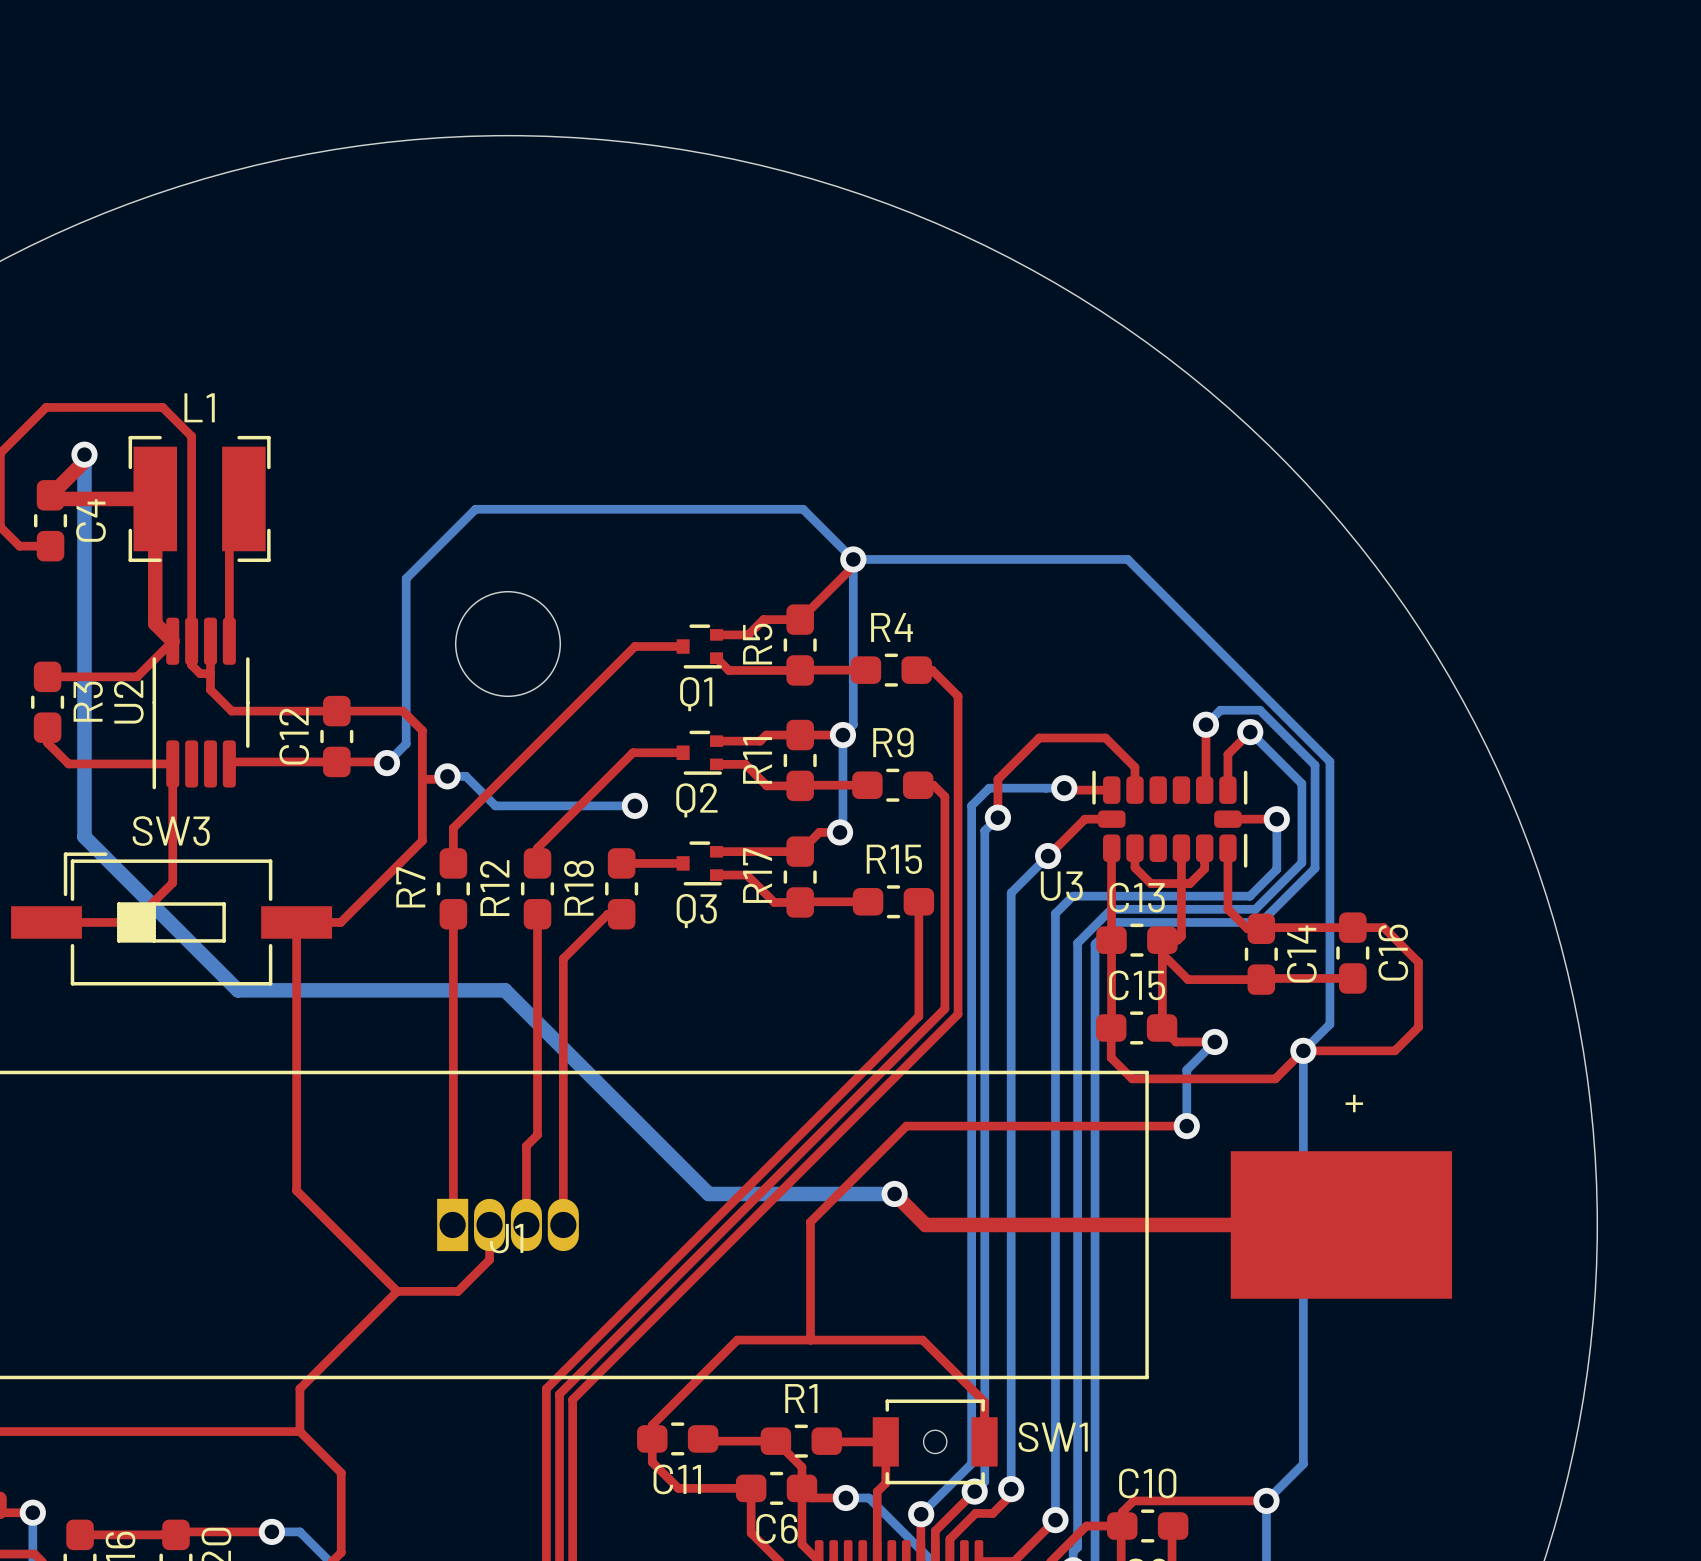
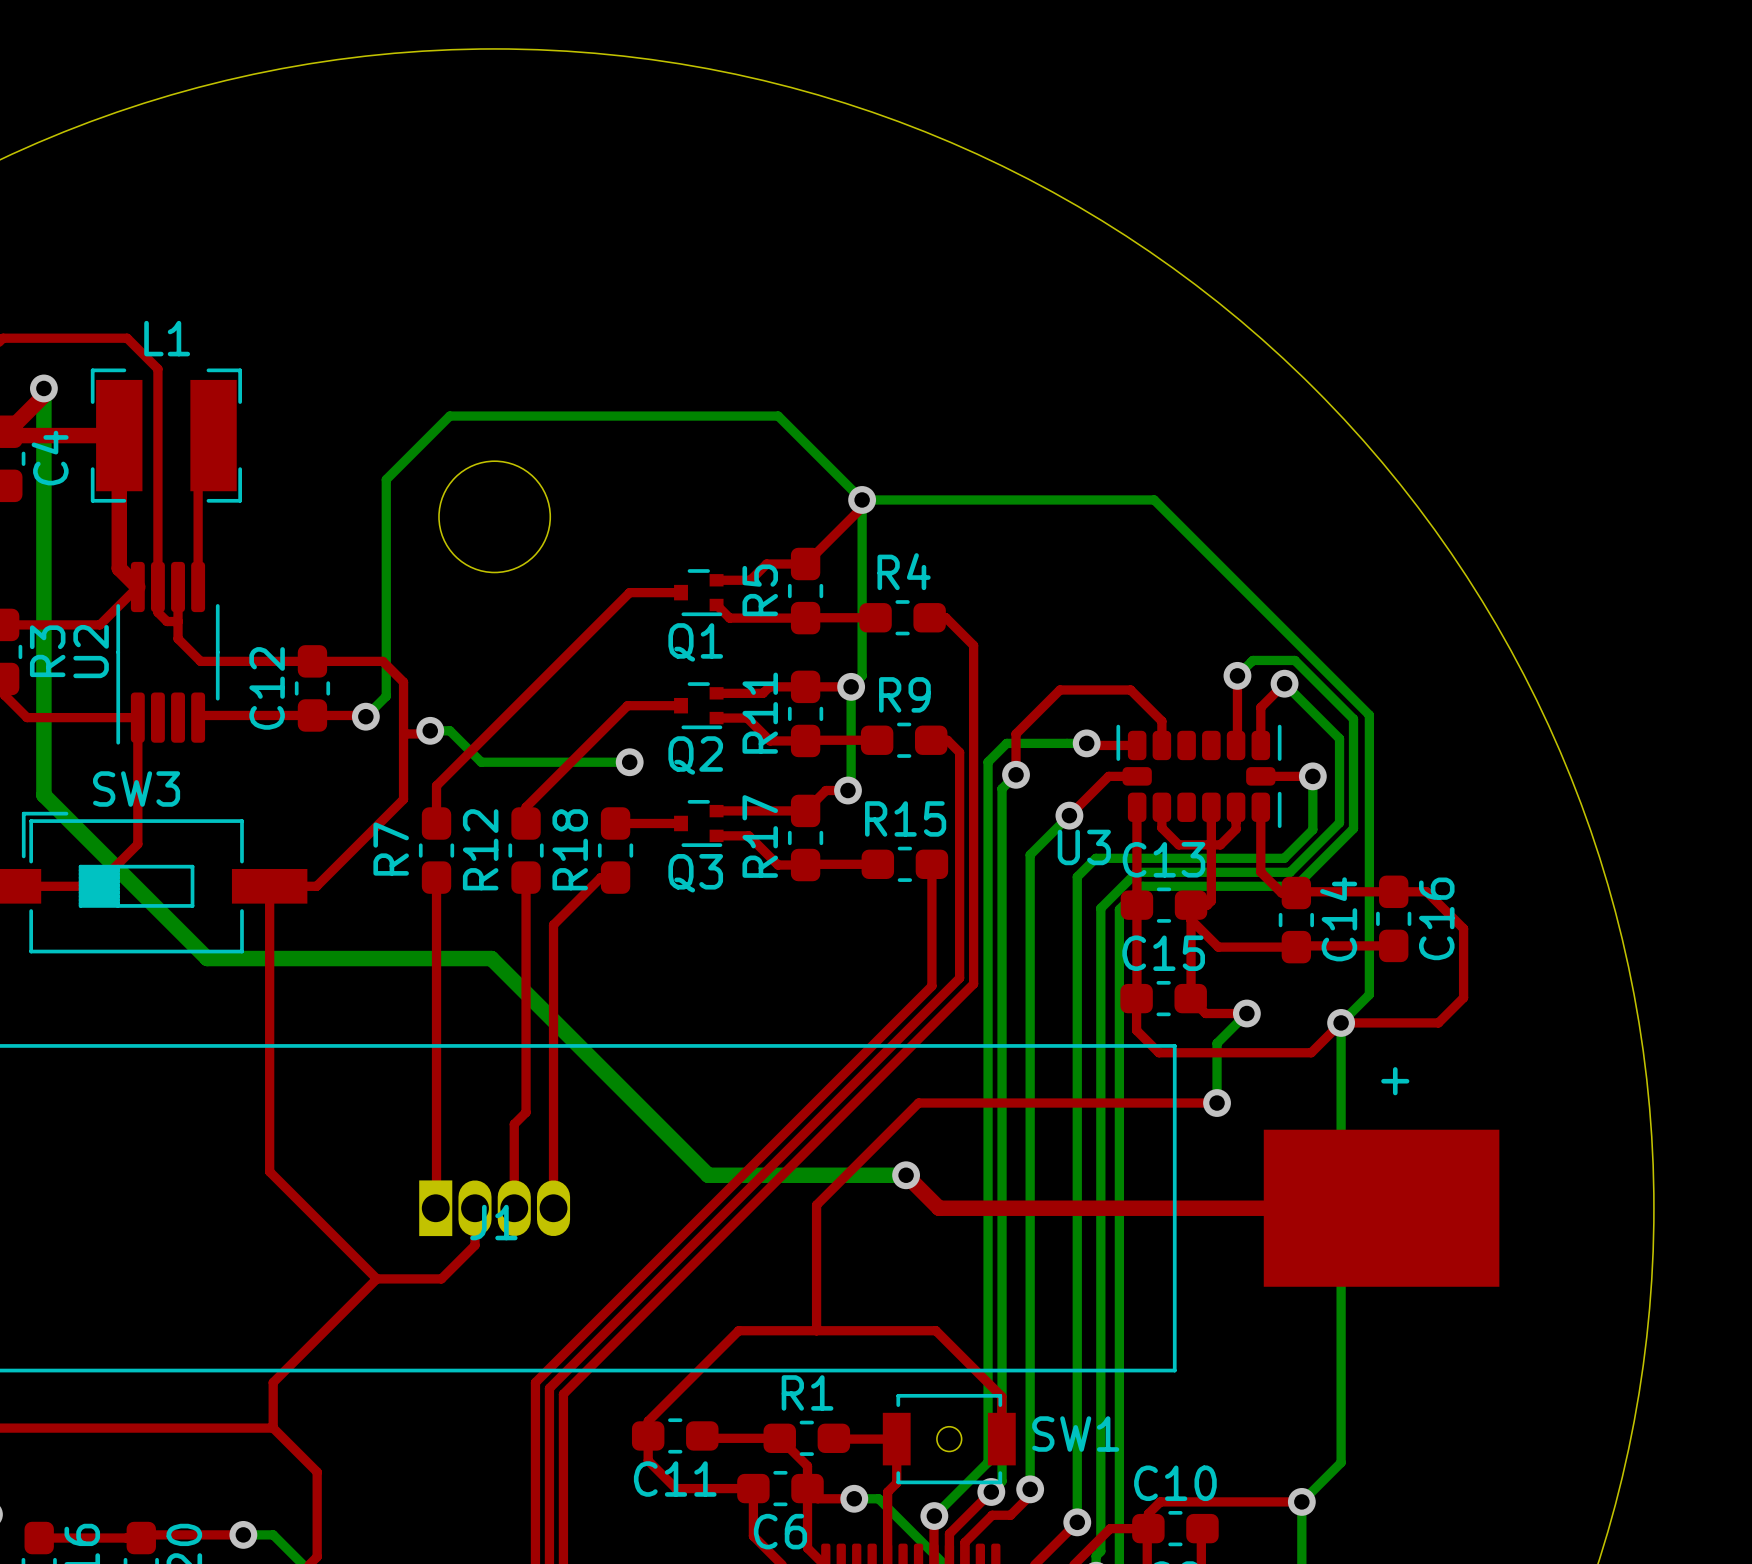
bottom track: (803, 509) (475, 509) (406, 578) -> (808, 446) (778, 416) (449, 416) (386, 479) (386, 520)
round board edge position: (508, 644) -> (494, 516)

